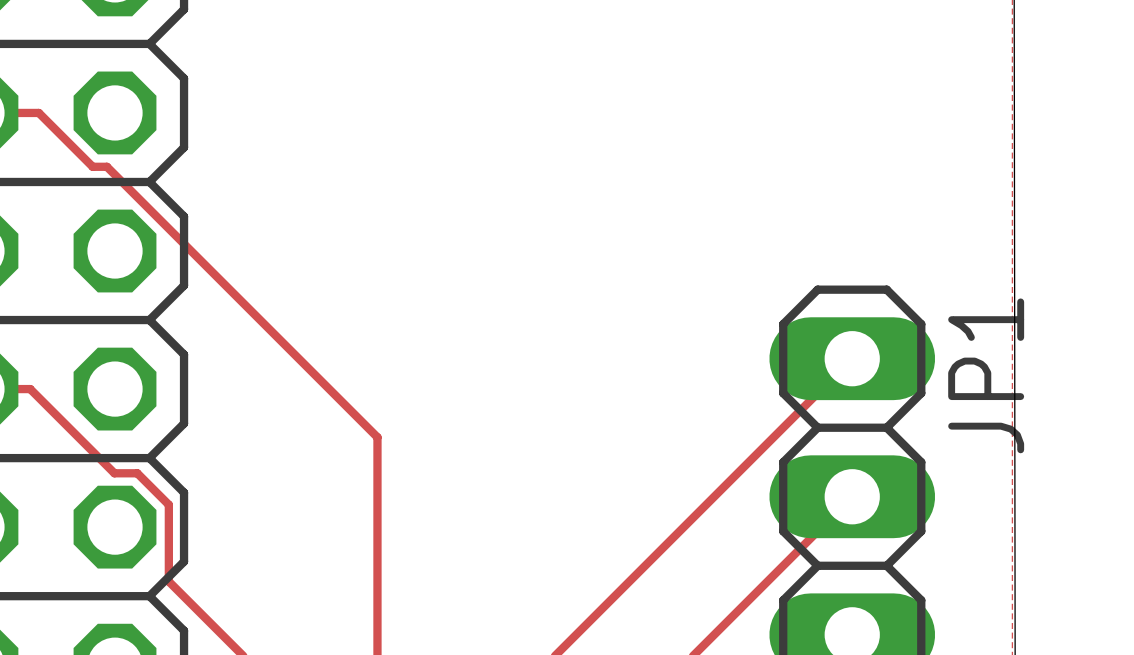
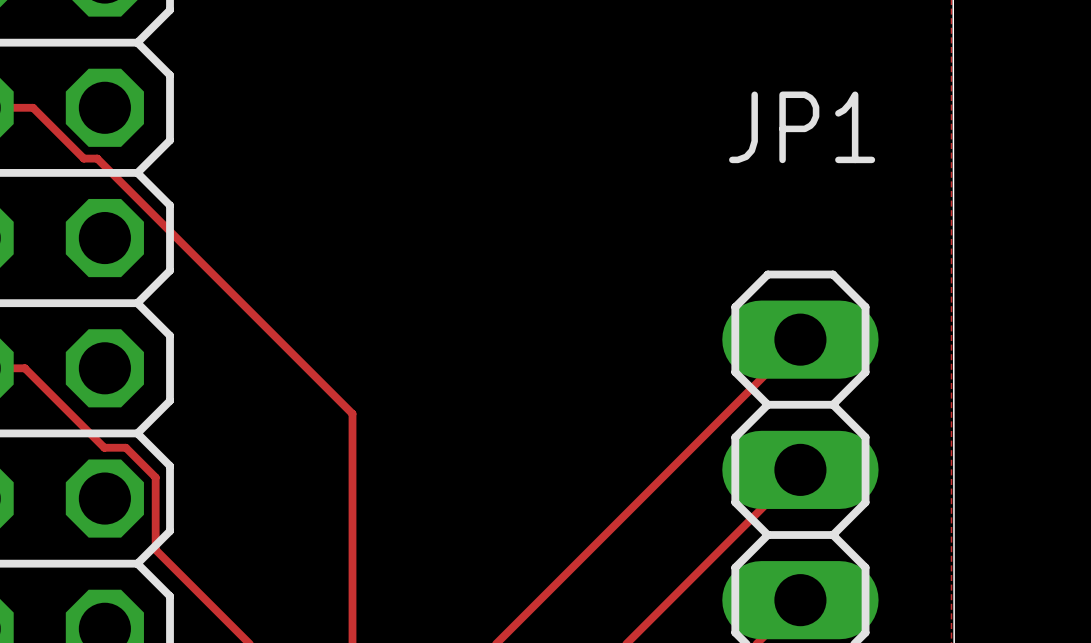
JP1 name rotation: 0° (986, 375) -> 90° clockwise (802, 127)
JP1 name position: JP1 (986, 375) -> JP1 (802, 127)

